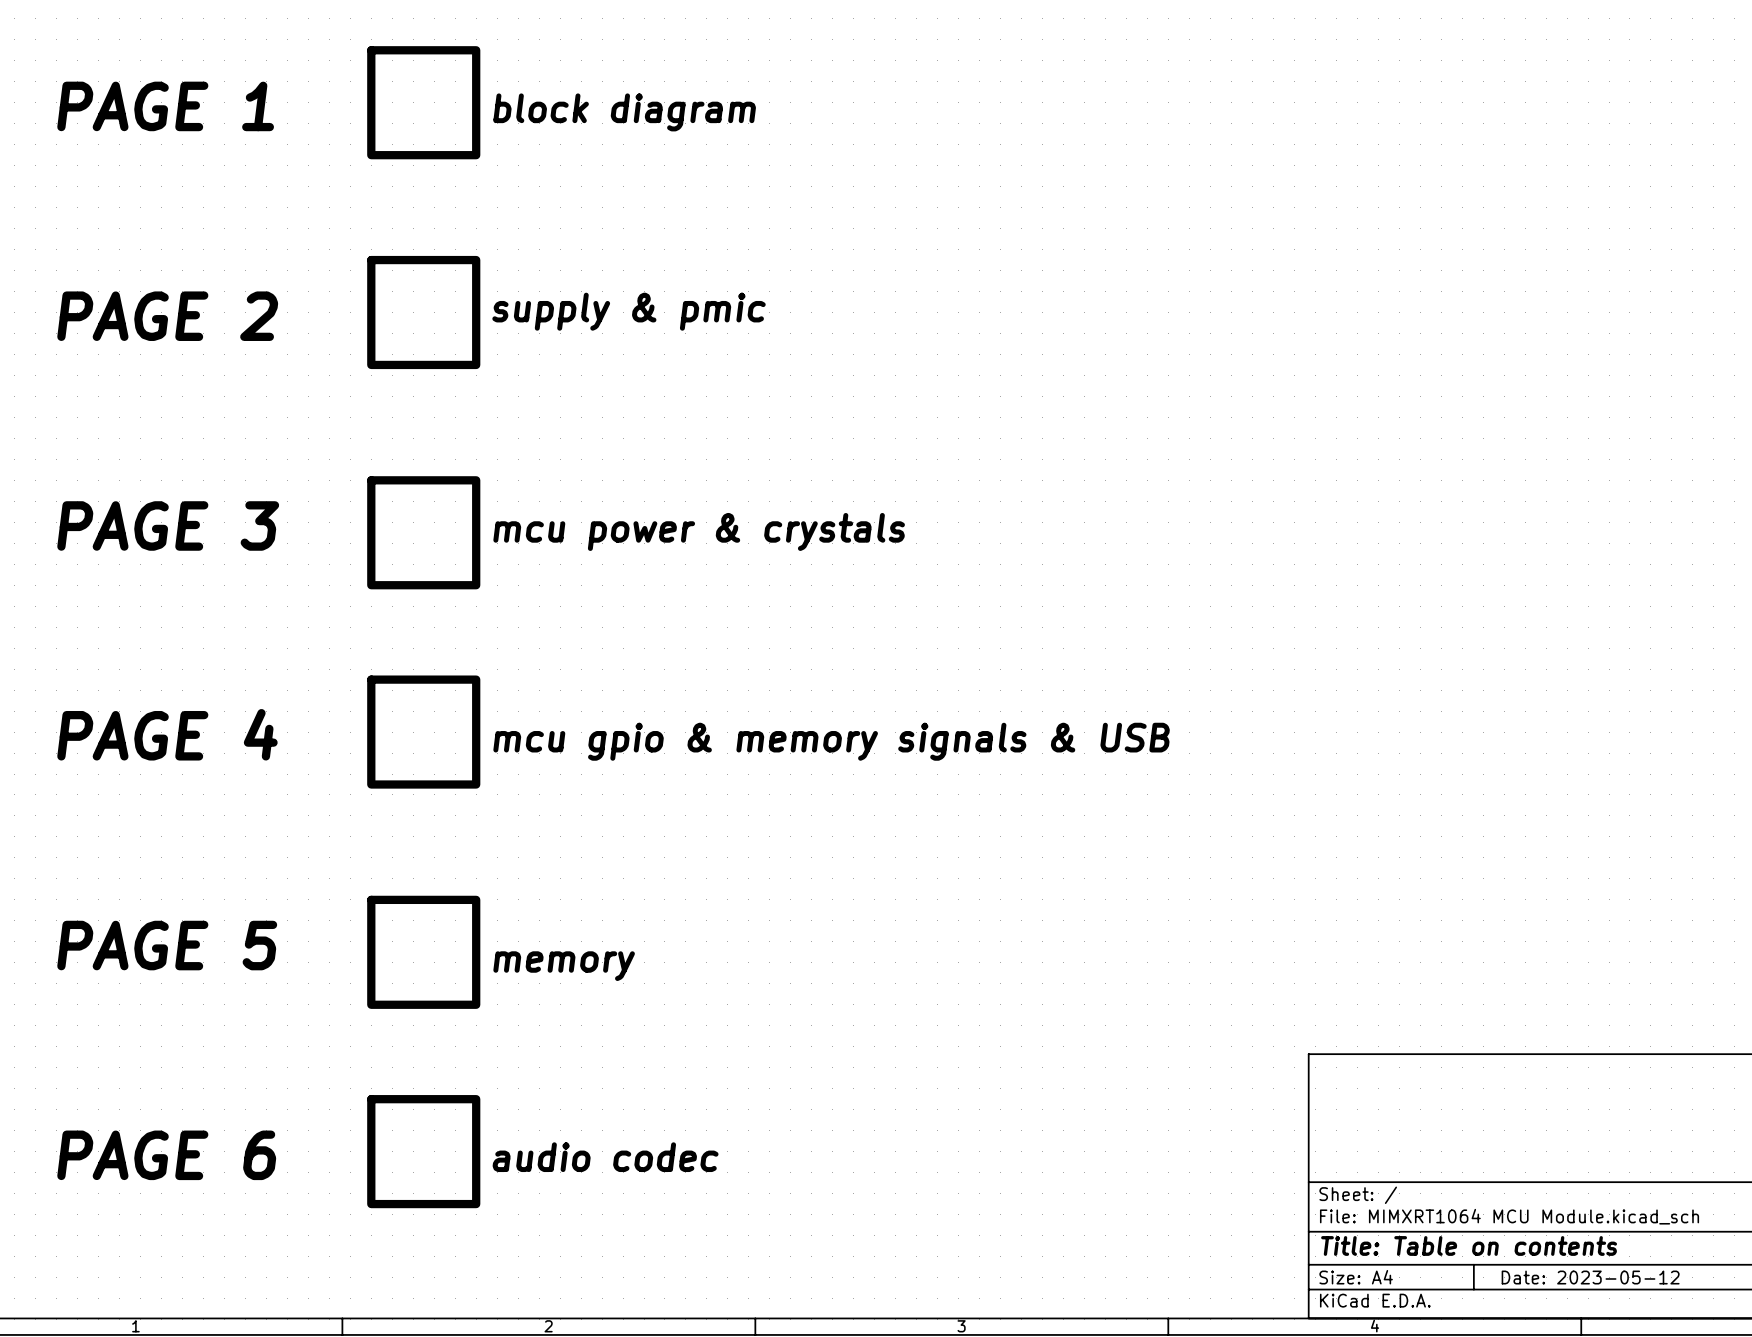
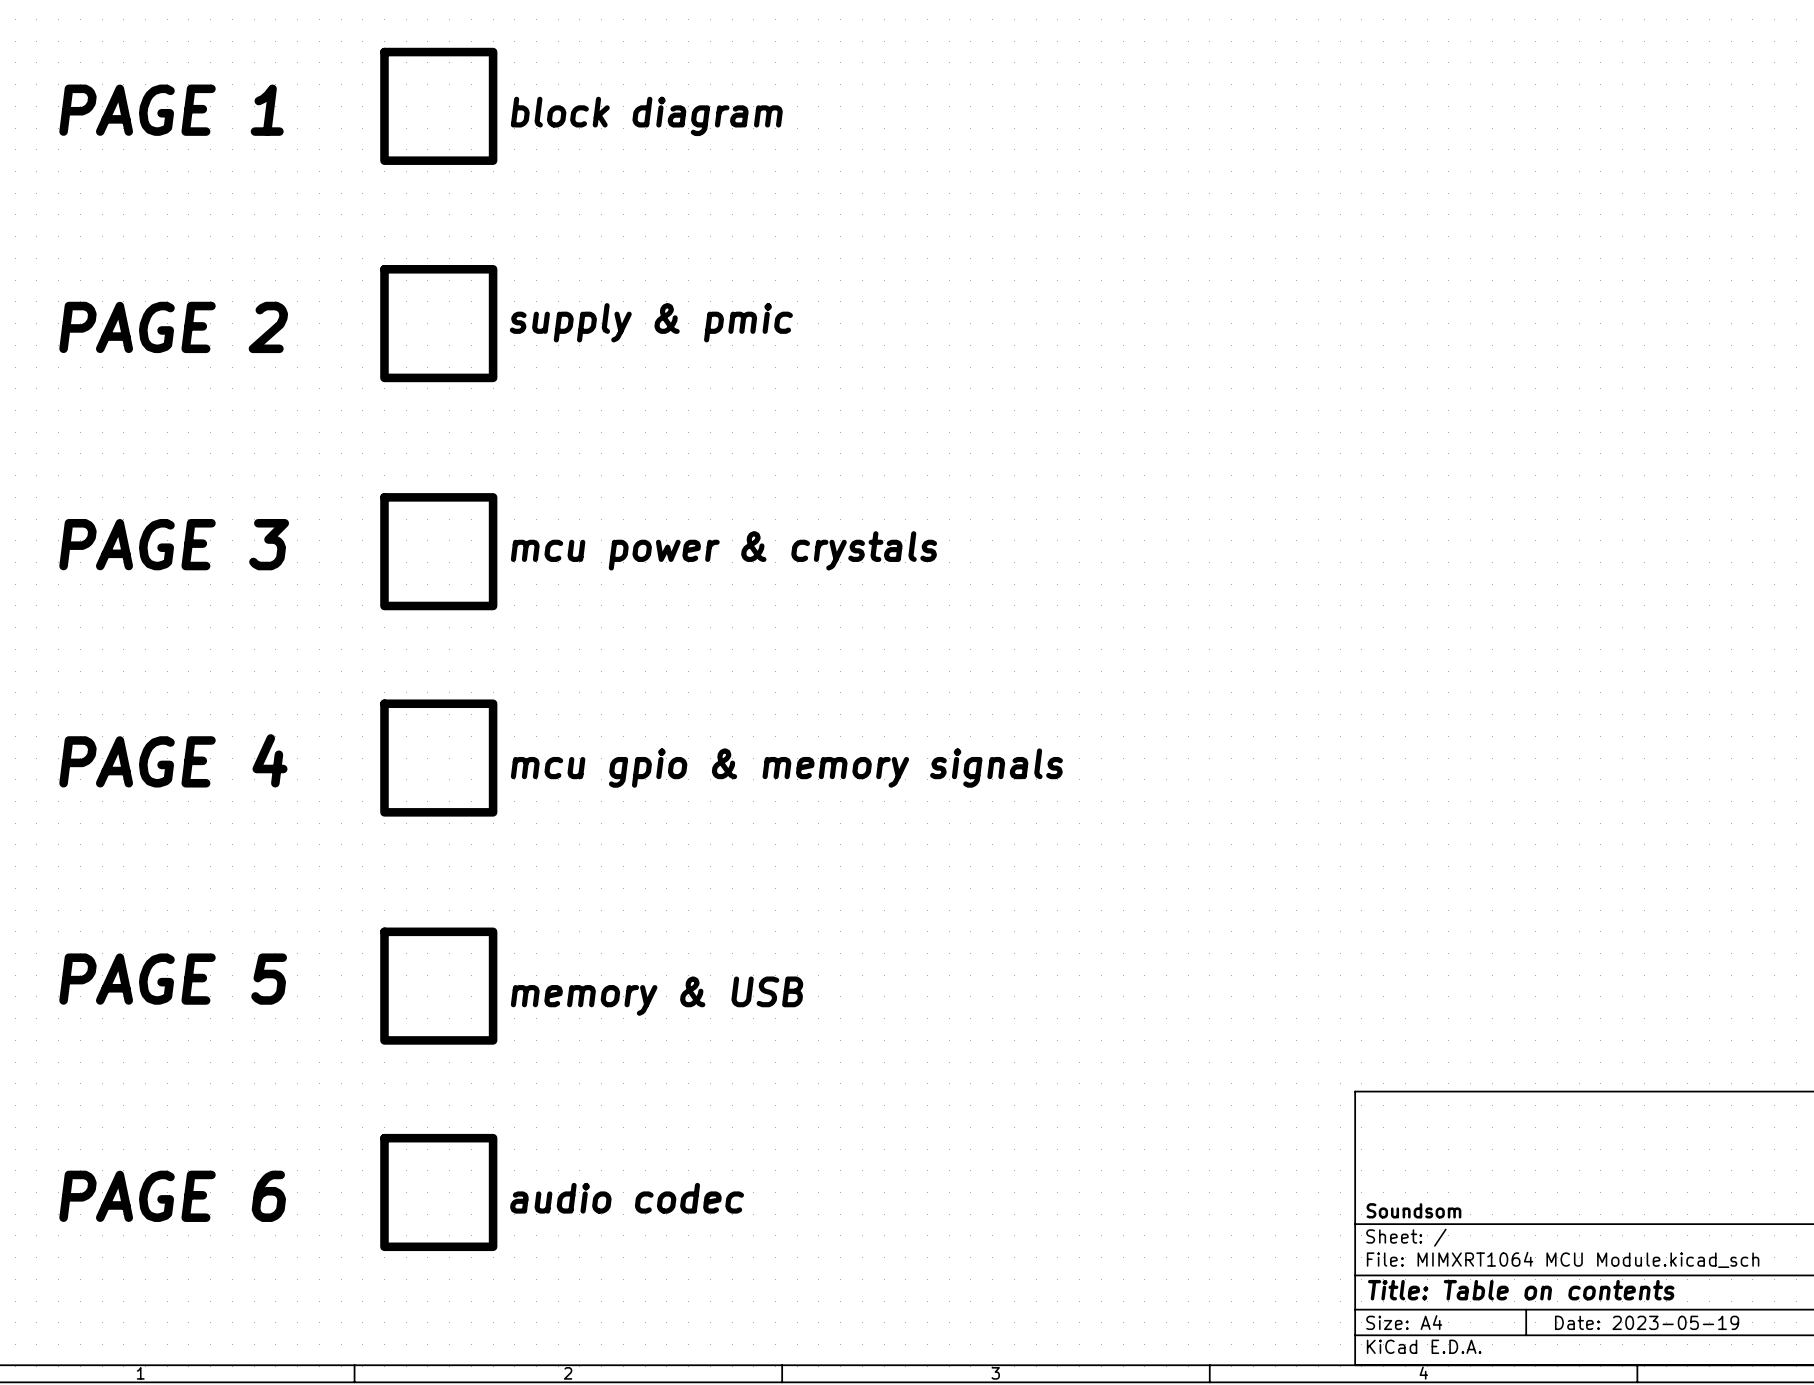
sheet mcu gpio & memory signals name: mcu gpio & memory signals & USB (831, 741) -> mcu gpio & memory signals (786, 768)
sheet memory name: memory (564, 966) -> memory & USB (657, 996)
title block: none -> Soundsom (1413, 1210)
title block: Date: 2023-05-12 (1590, 1277) -> Date: 2023-05-19 (1647, 1322)

